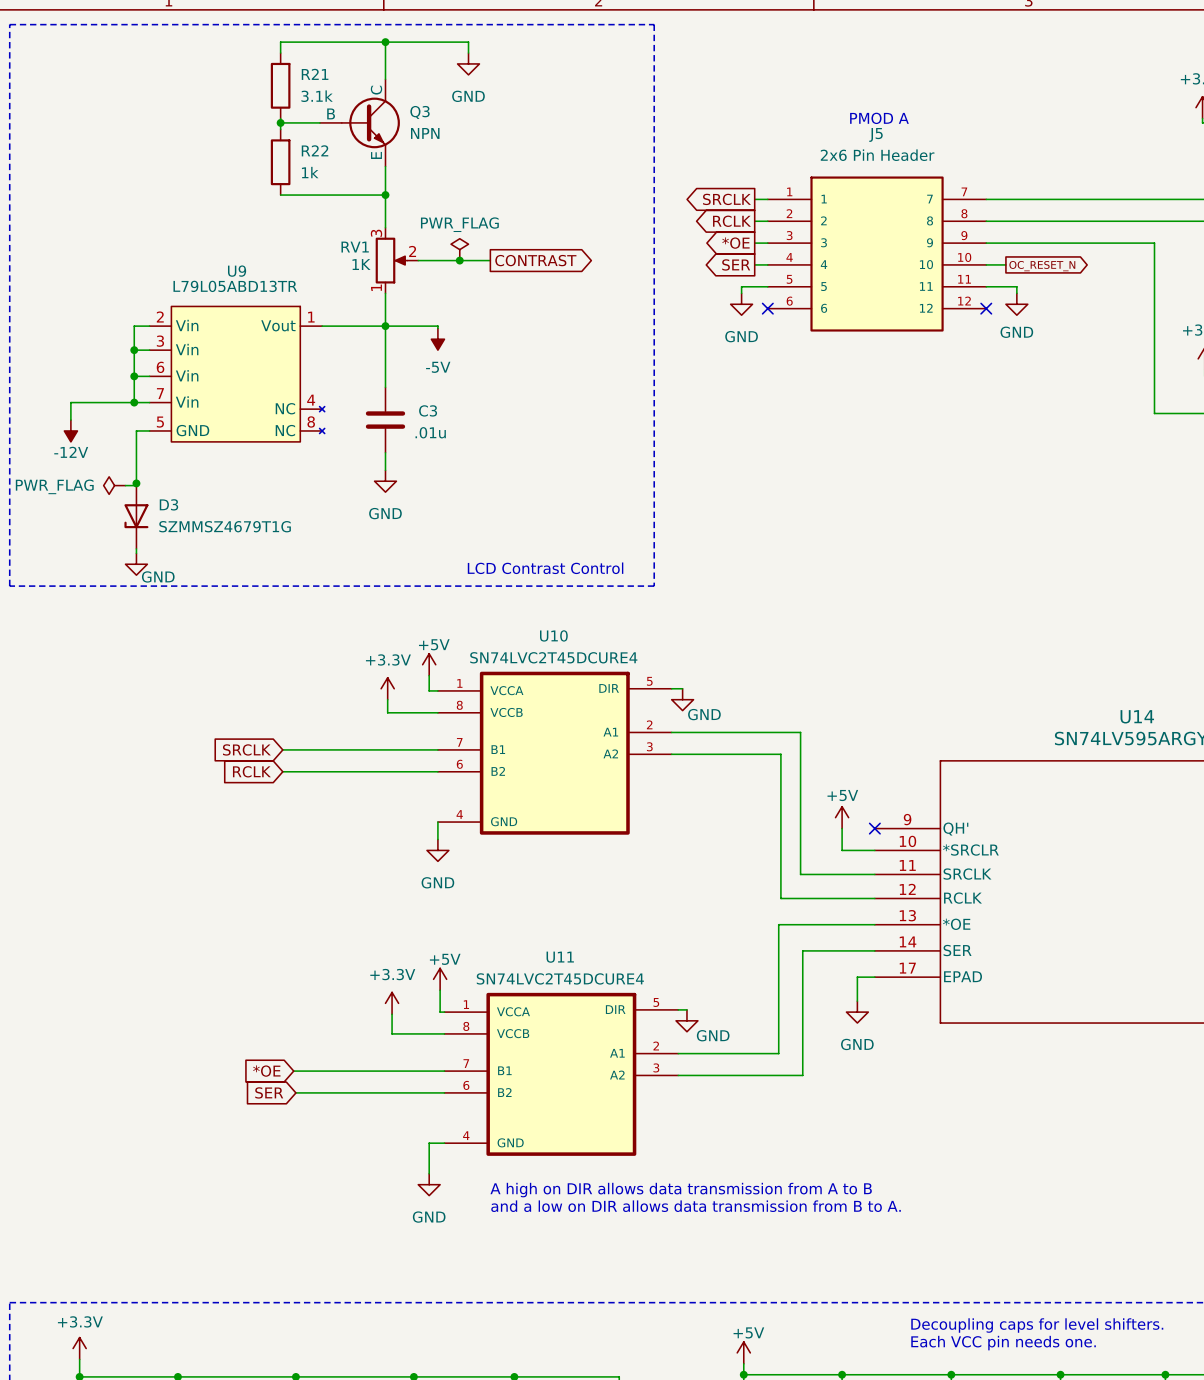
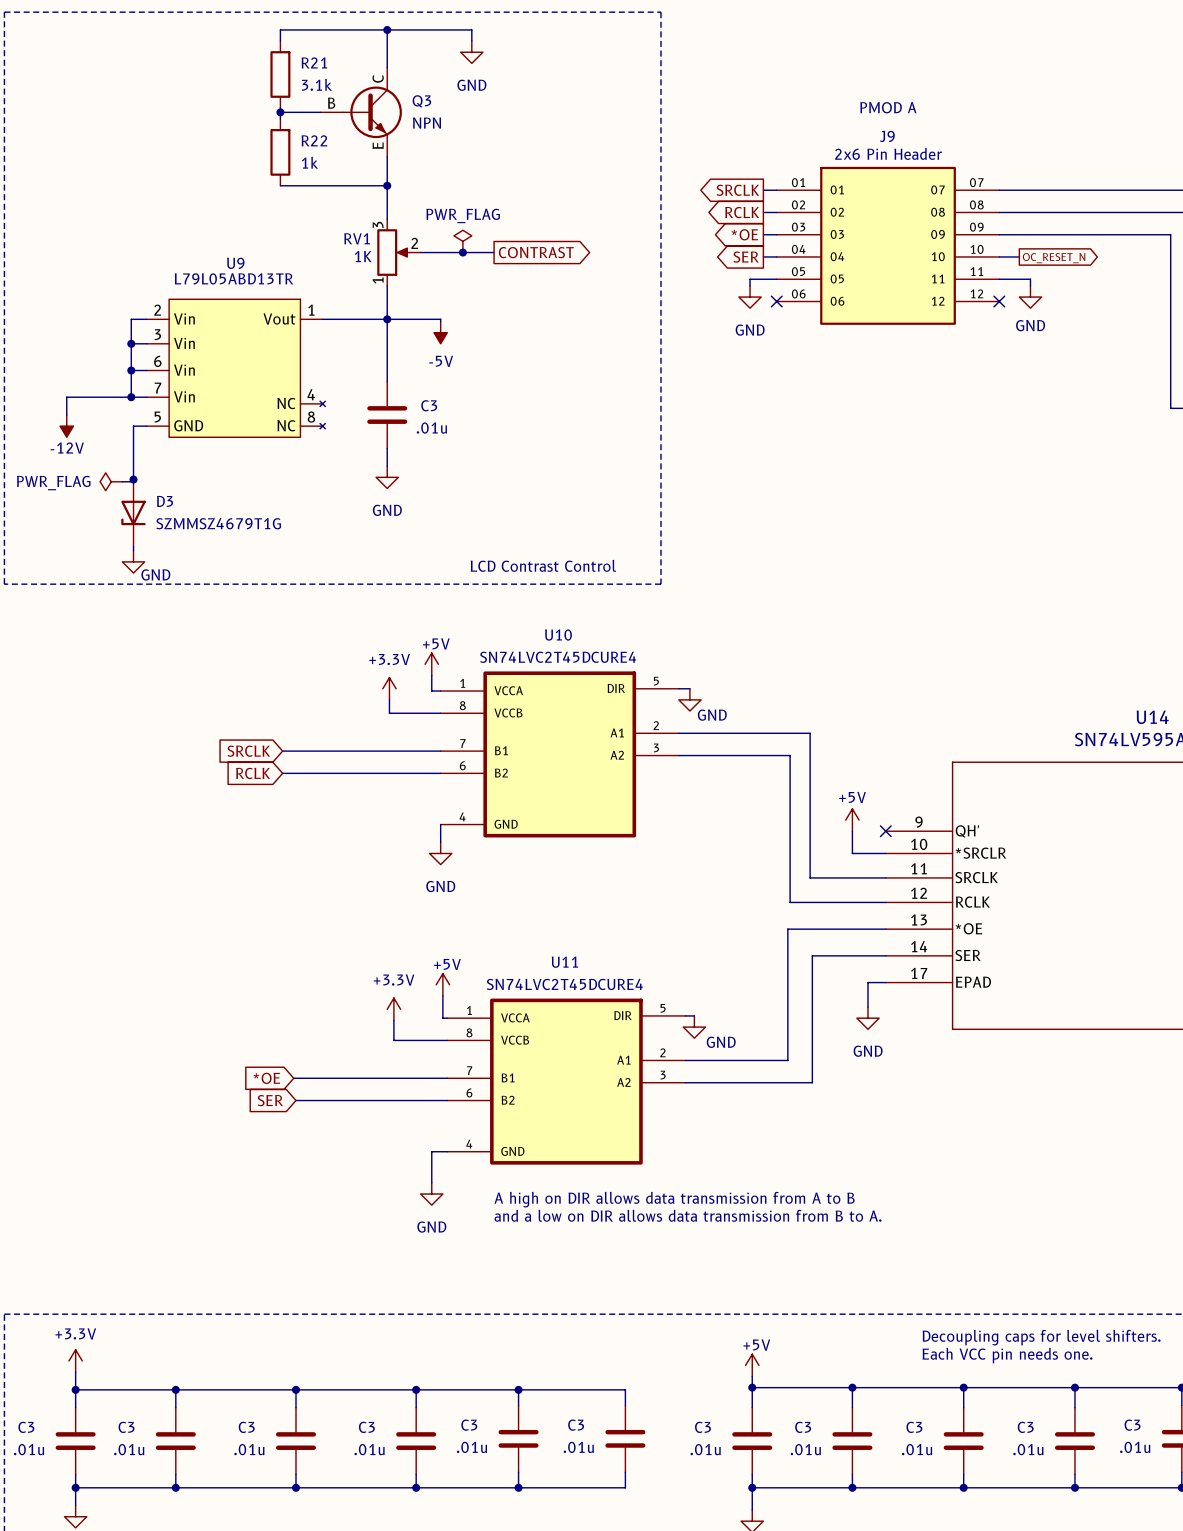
J5 name: J5 (876, 134) -> J9 (887, 136)
J5 symbol: [767, 176, 987, 332] -> [776, 166, 1000, 325]

